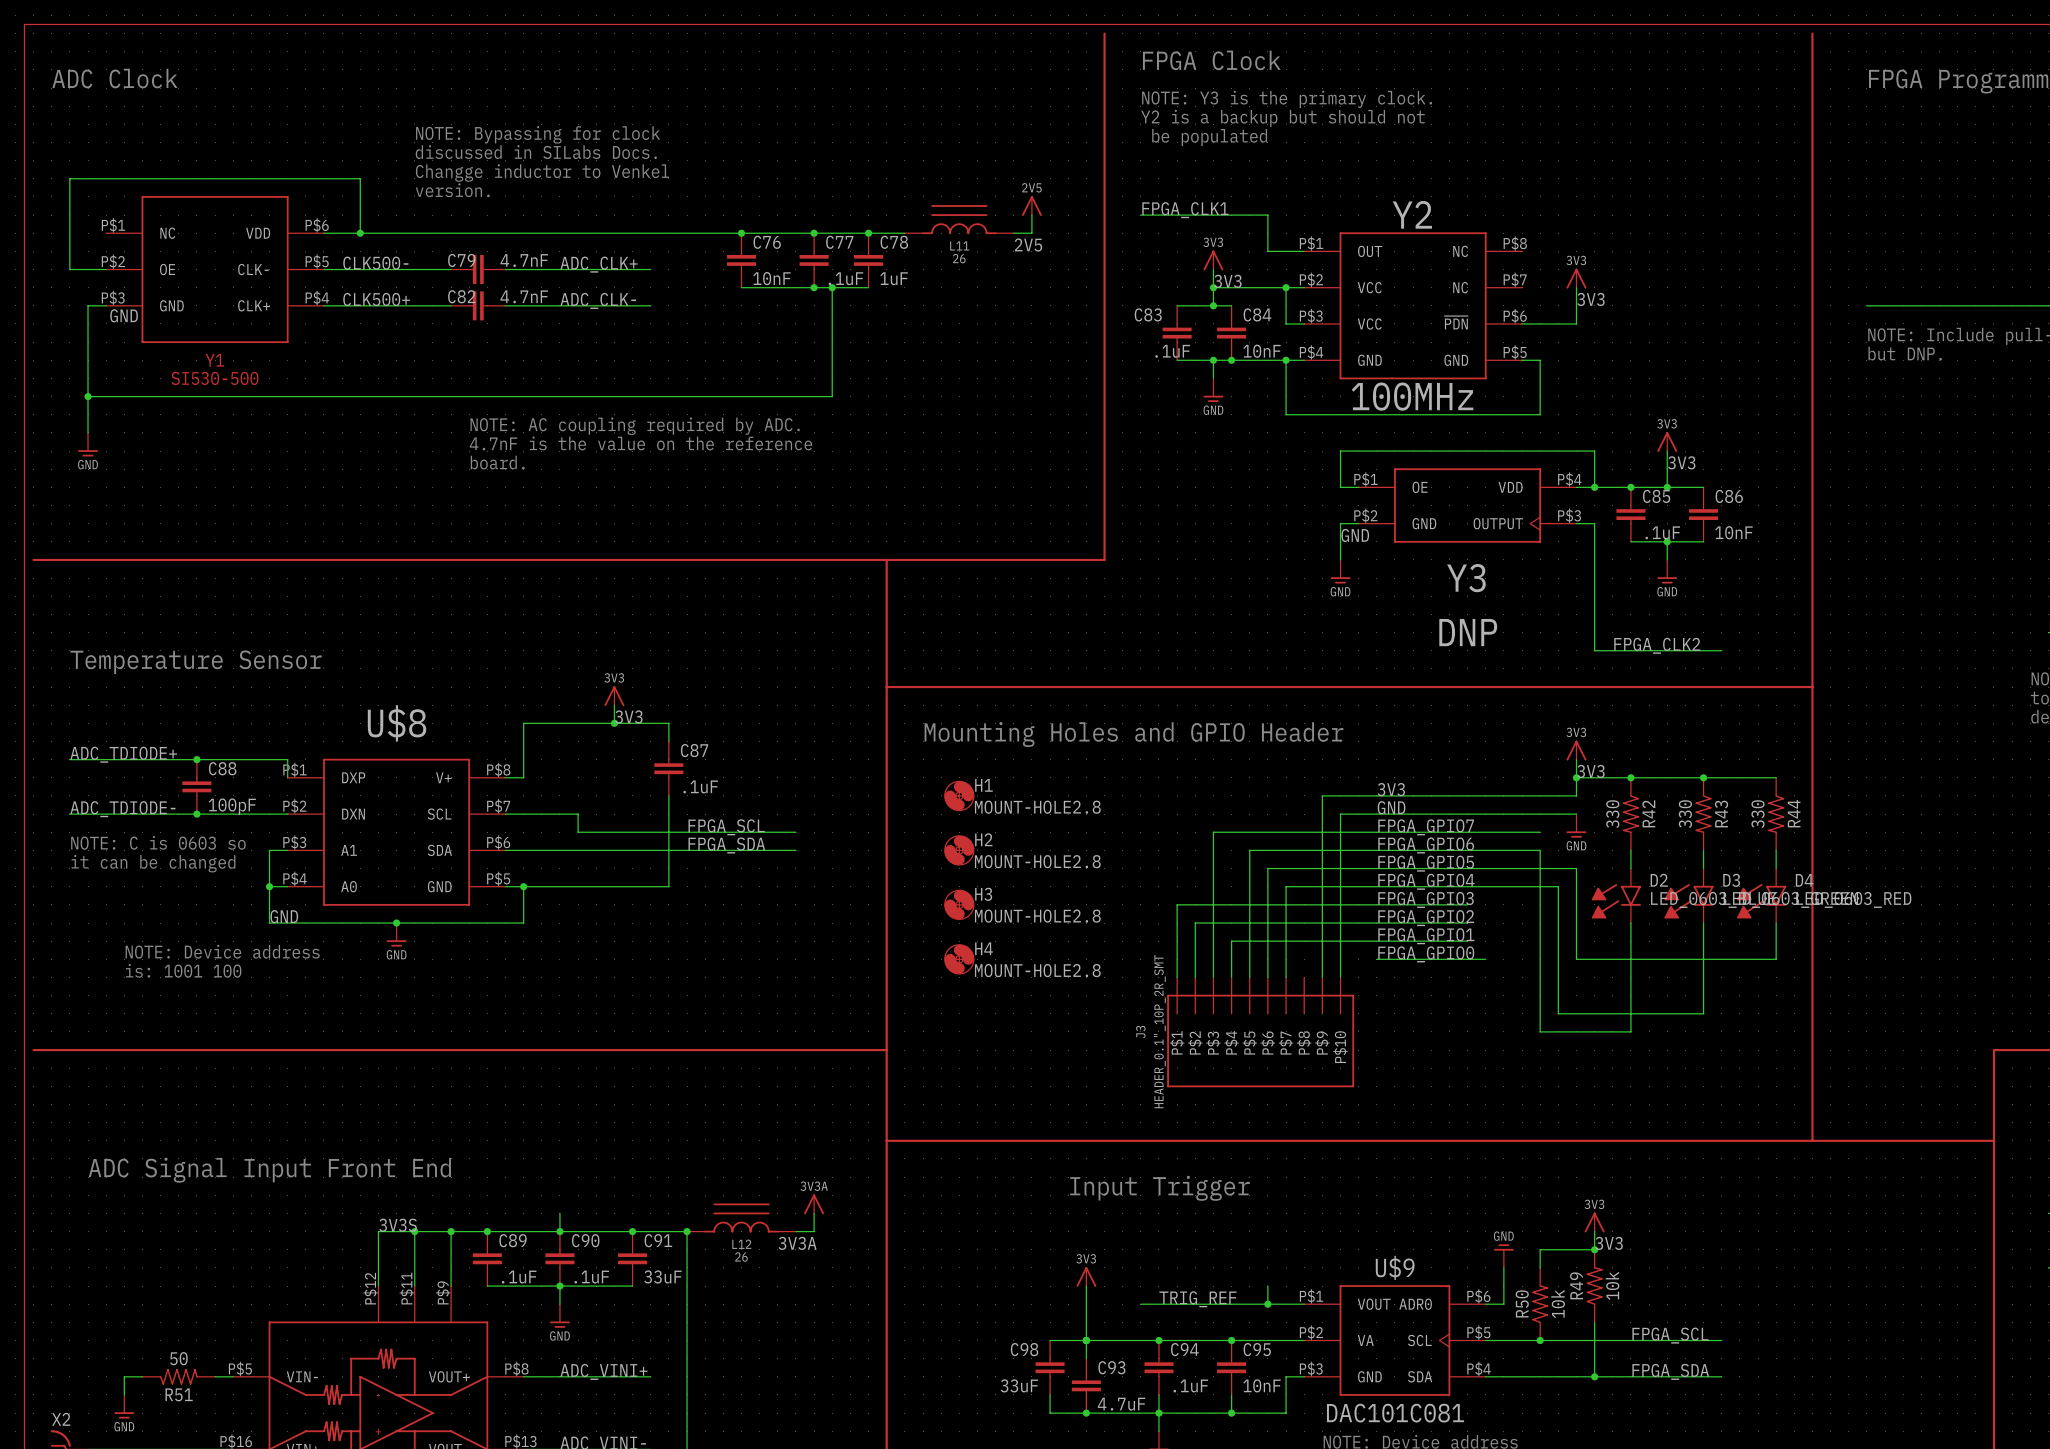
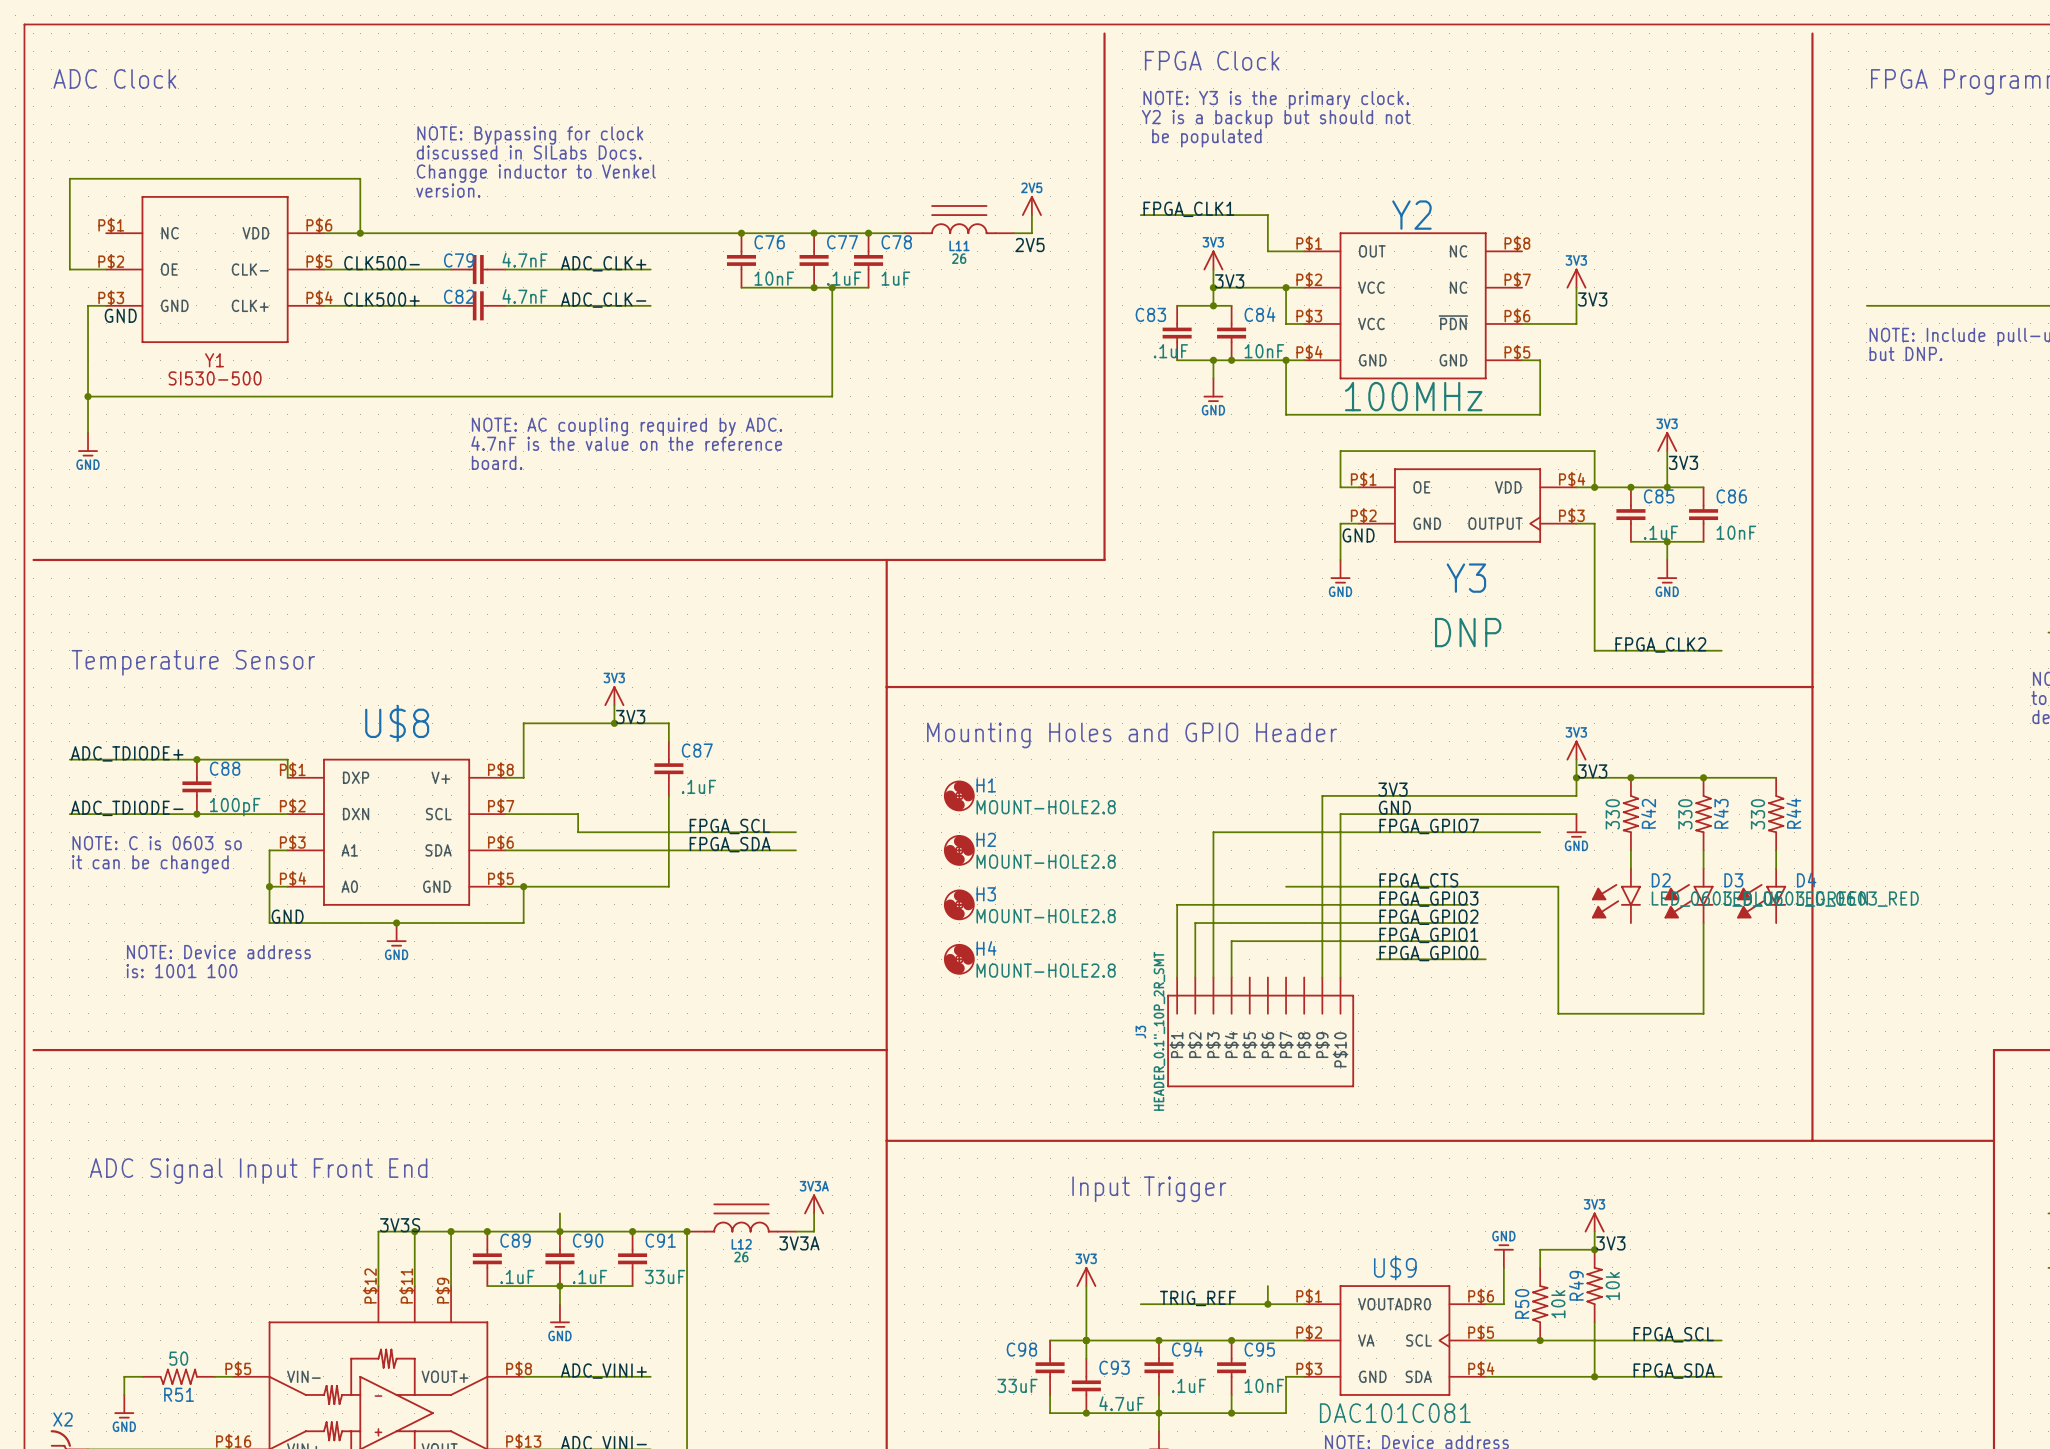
label: FPGA_GPIO6 (1426, 845) -> none
label: FPGA_GPIO5 (1426, 863) -> none
label: FPGA_GPIO4 (1426, 881) -> FPGA_CTS (1418, 880)
wire: (1286, 886) (1286, 977) -> none
wire: (1630, 923) (1630, 1031) (1540, 1031) (1540, 850) (1249, 850) (1249, 977) -> none
wire: (1776, 923) (1776, 959) (1576, 959) (1576, 868) (1267, 868) (1267, 977) -> none

